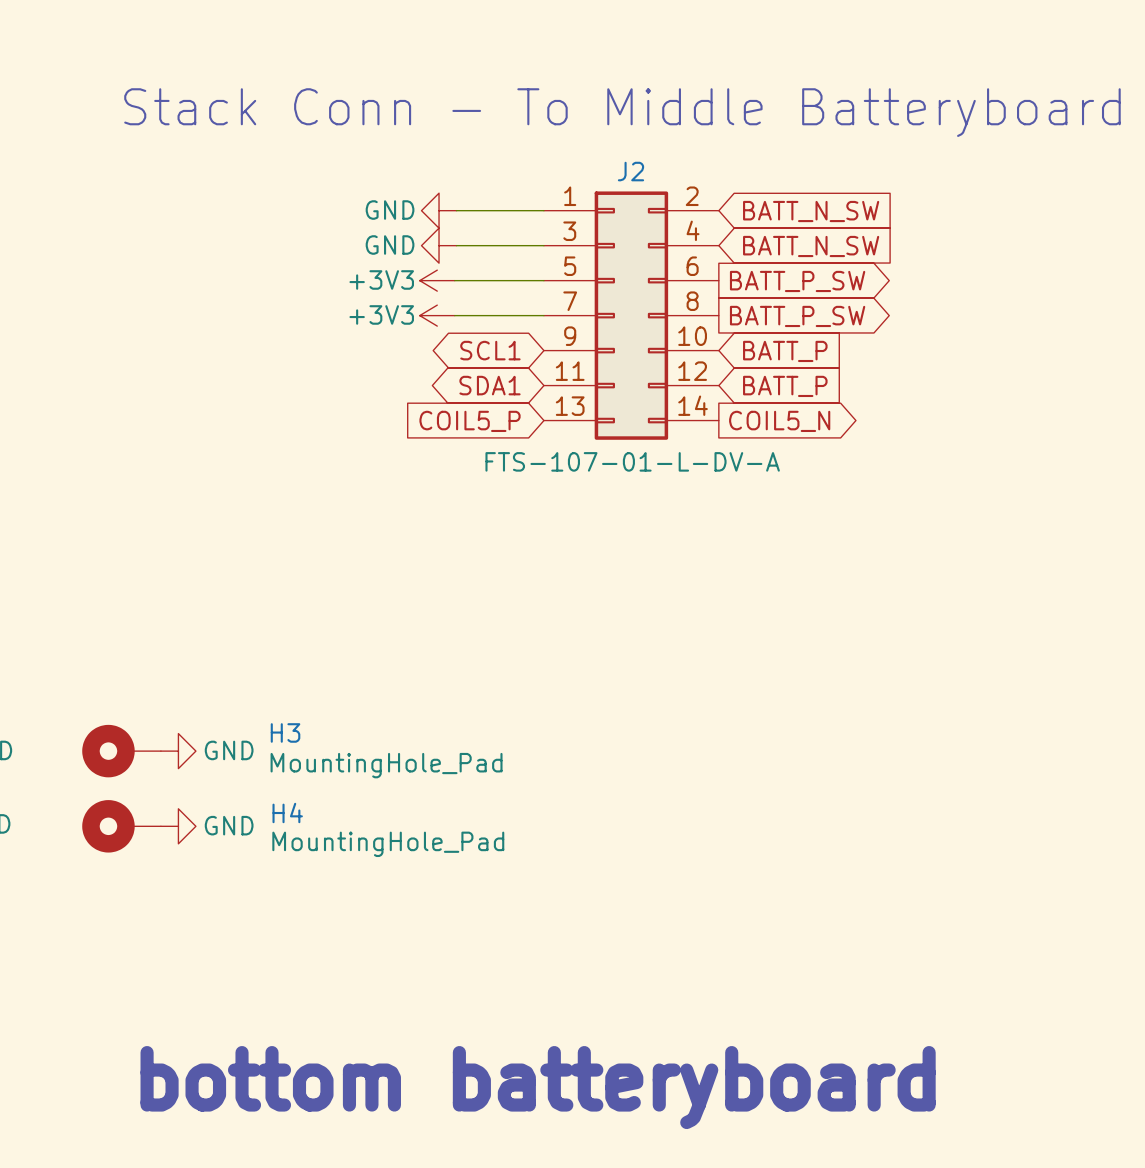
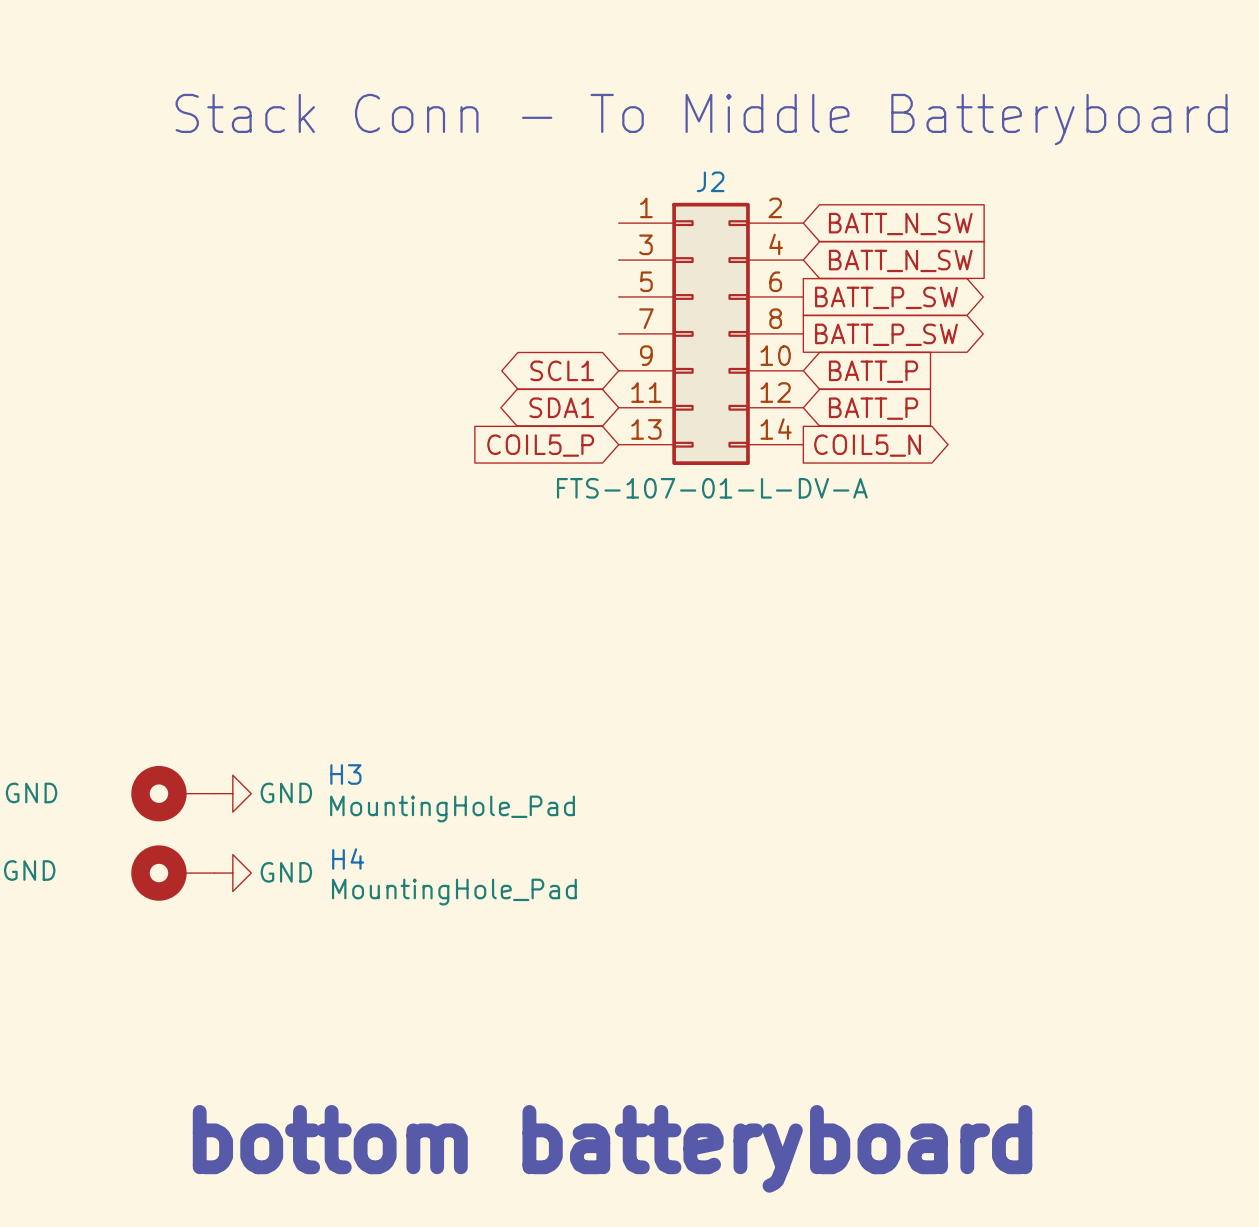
power symbol: GND (439, 210) -> none
wire: (456, 210) (543, 210) -> none
power symbol: GND (439, 245) -> none
wire: (456, 245) (543, 245) -> none
power symbol: +3V3 (437, 280) -> none
wire: (454, 280) (543, 280) -> none
power symbol: +3V3 (437, 315) -> none
wire: (454, 315) (543, 315) -> none

